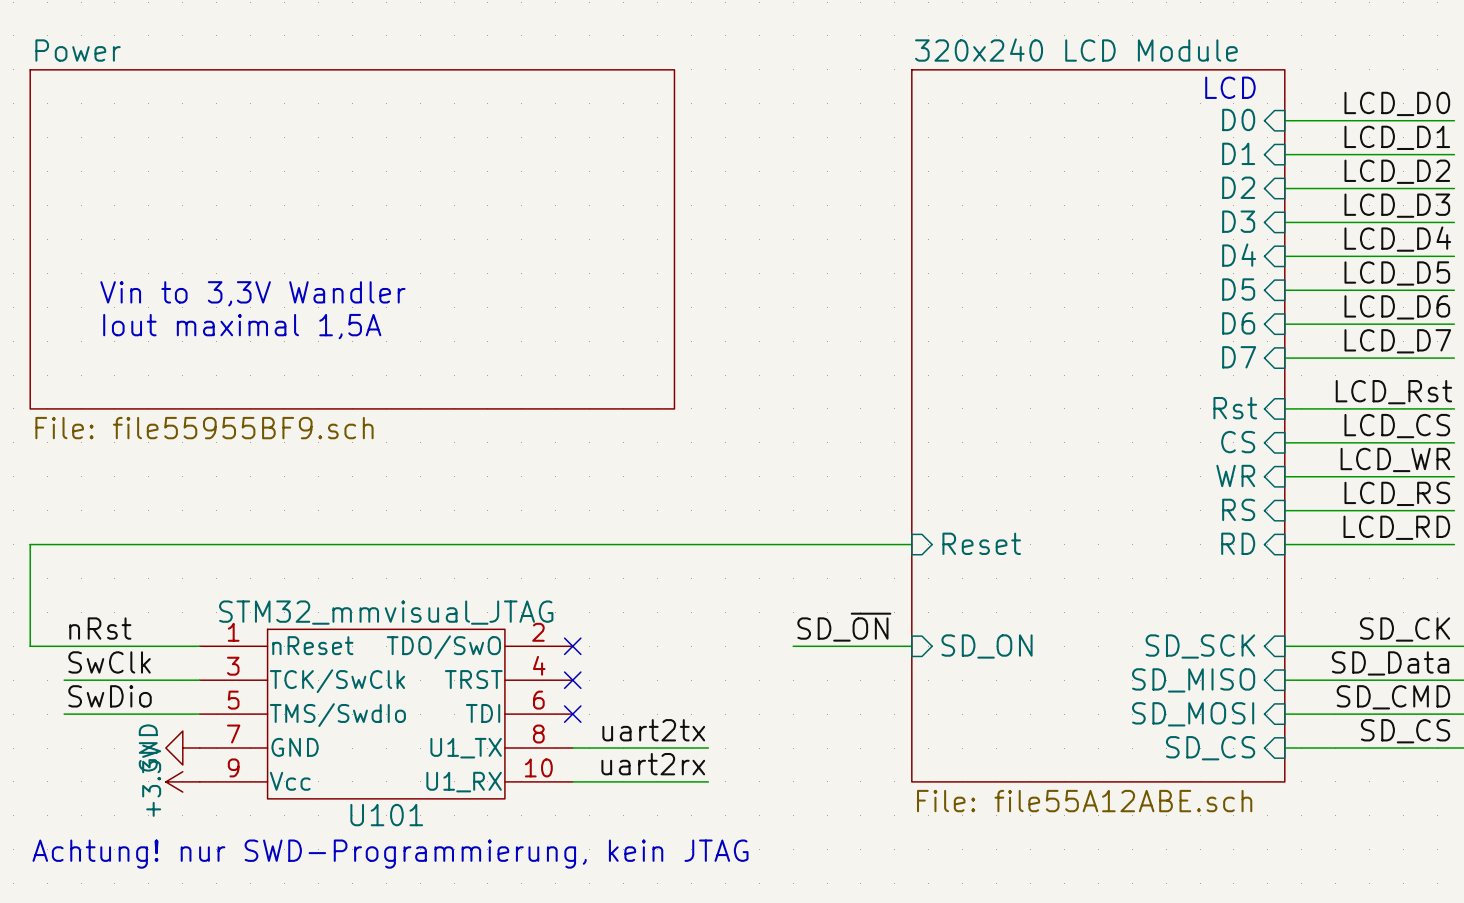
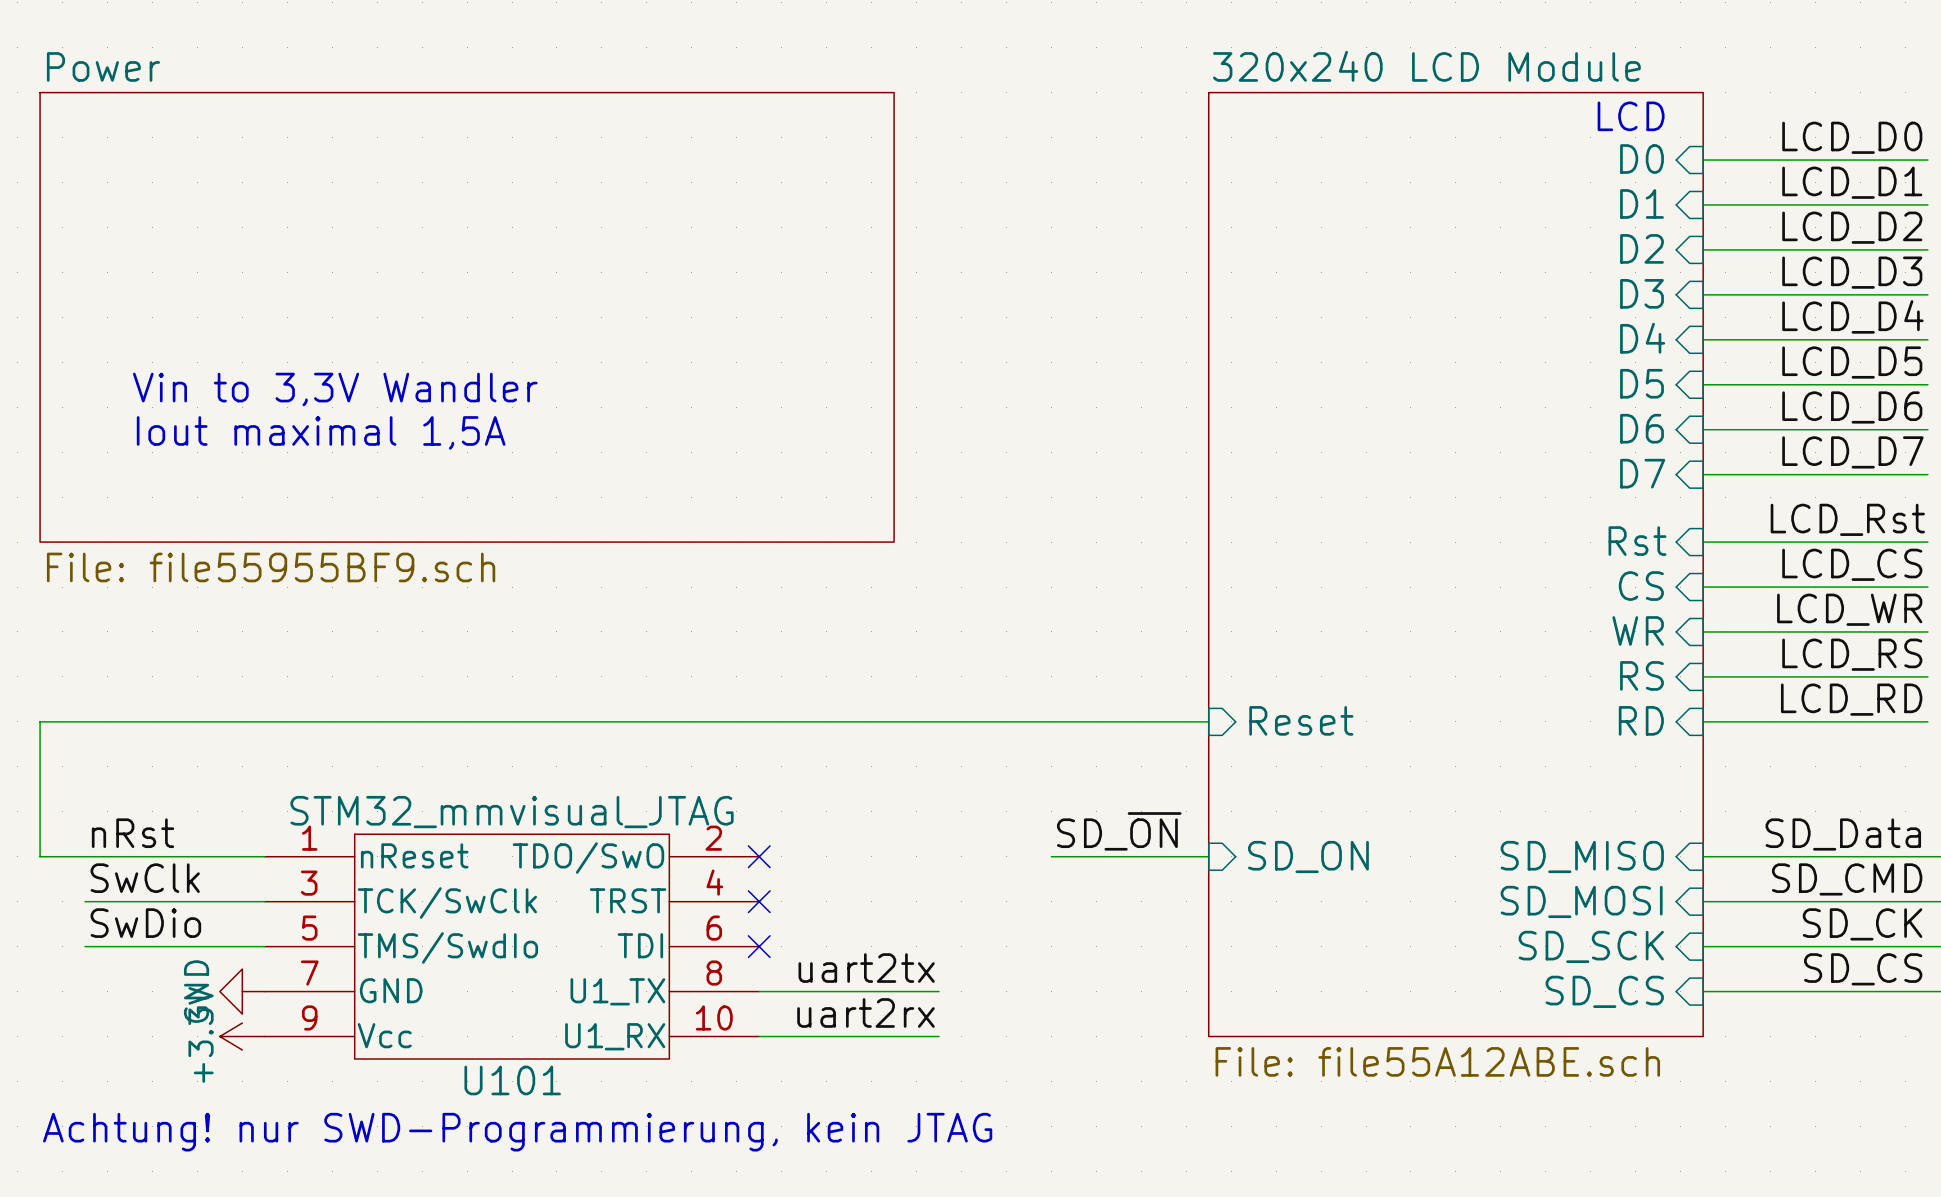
label: SD_CK (1405, 629) -> SD_Data (1843, 834)
sheet pin: SD_SCK (1200, 646) -> SD_MISO (1582, 857)
label: SD_Data (1390, 663) -> SD_CMD (1847, 879)
sheet pin: SD_MISO (1193, 680) -> SD_MOSI (1581, 901)
label: SD_CMD (1393, 697) -> SD_CK (1862, 924)
sheet pin: SD_MOSI (1193, 714) -> SD_SCK (1591, 946)

